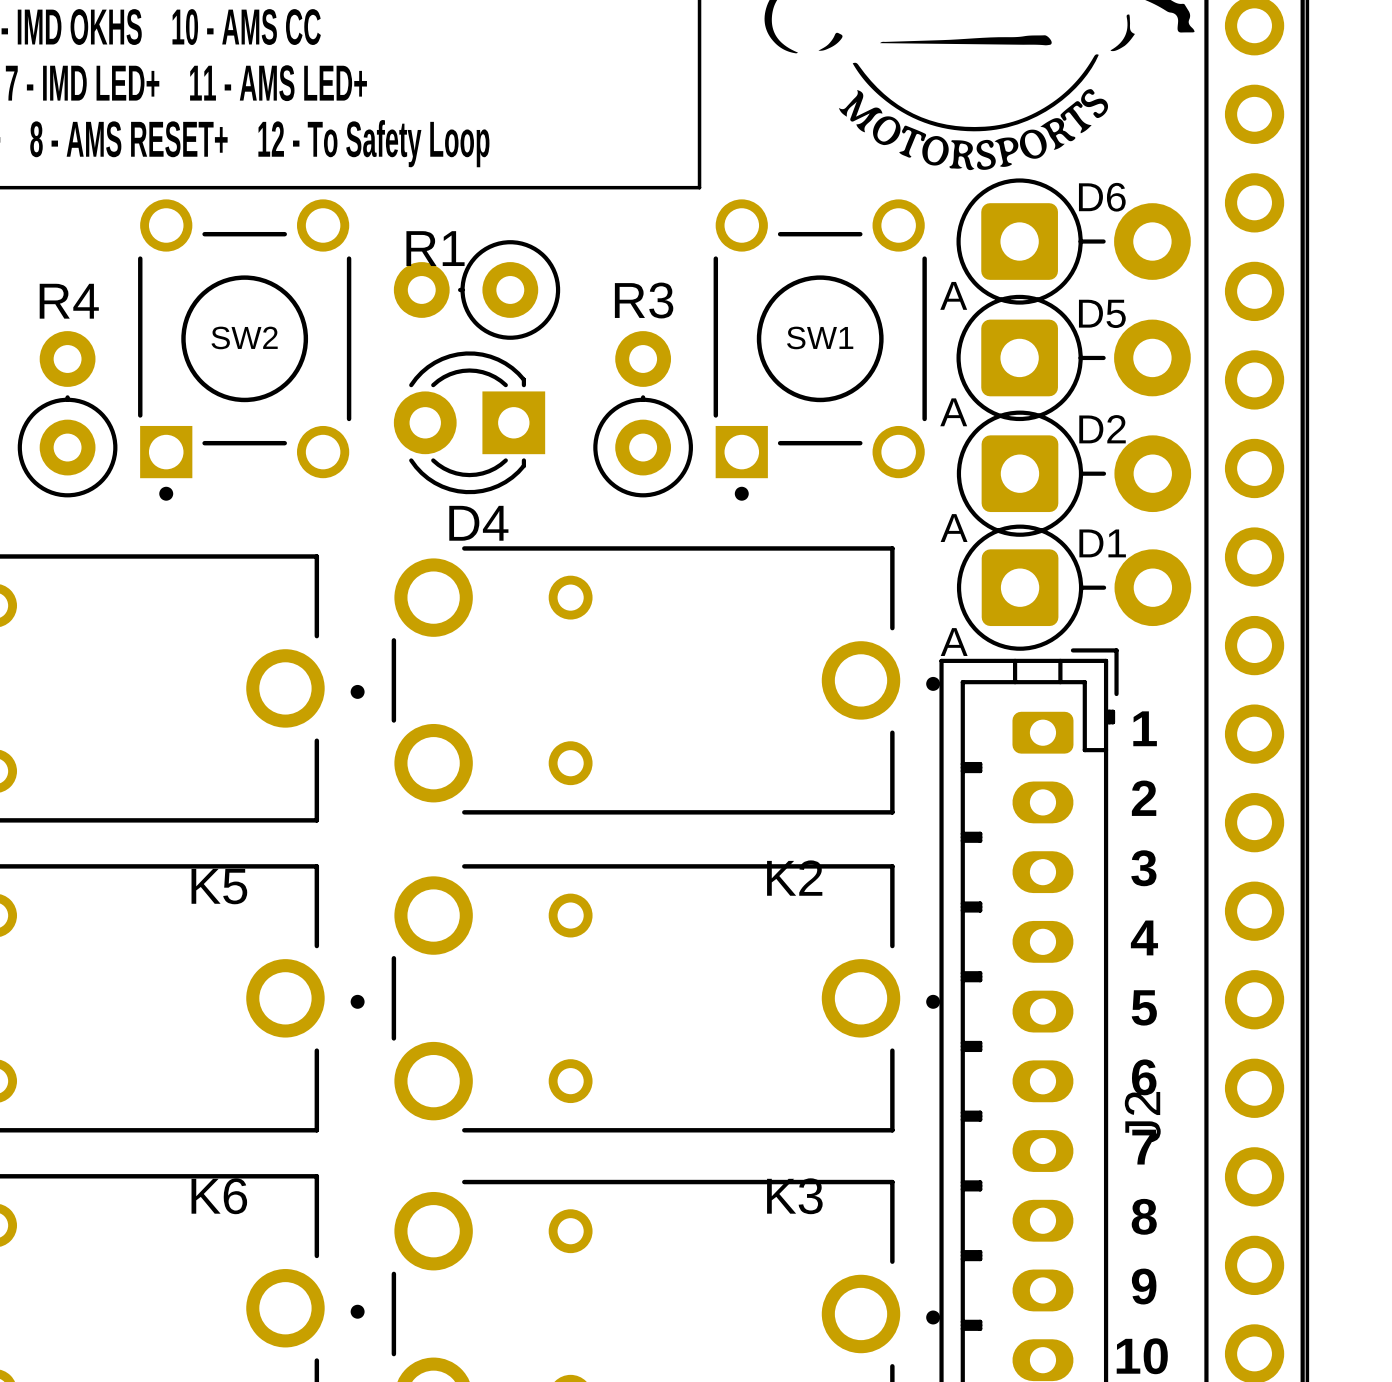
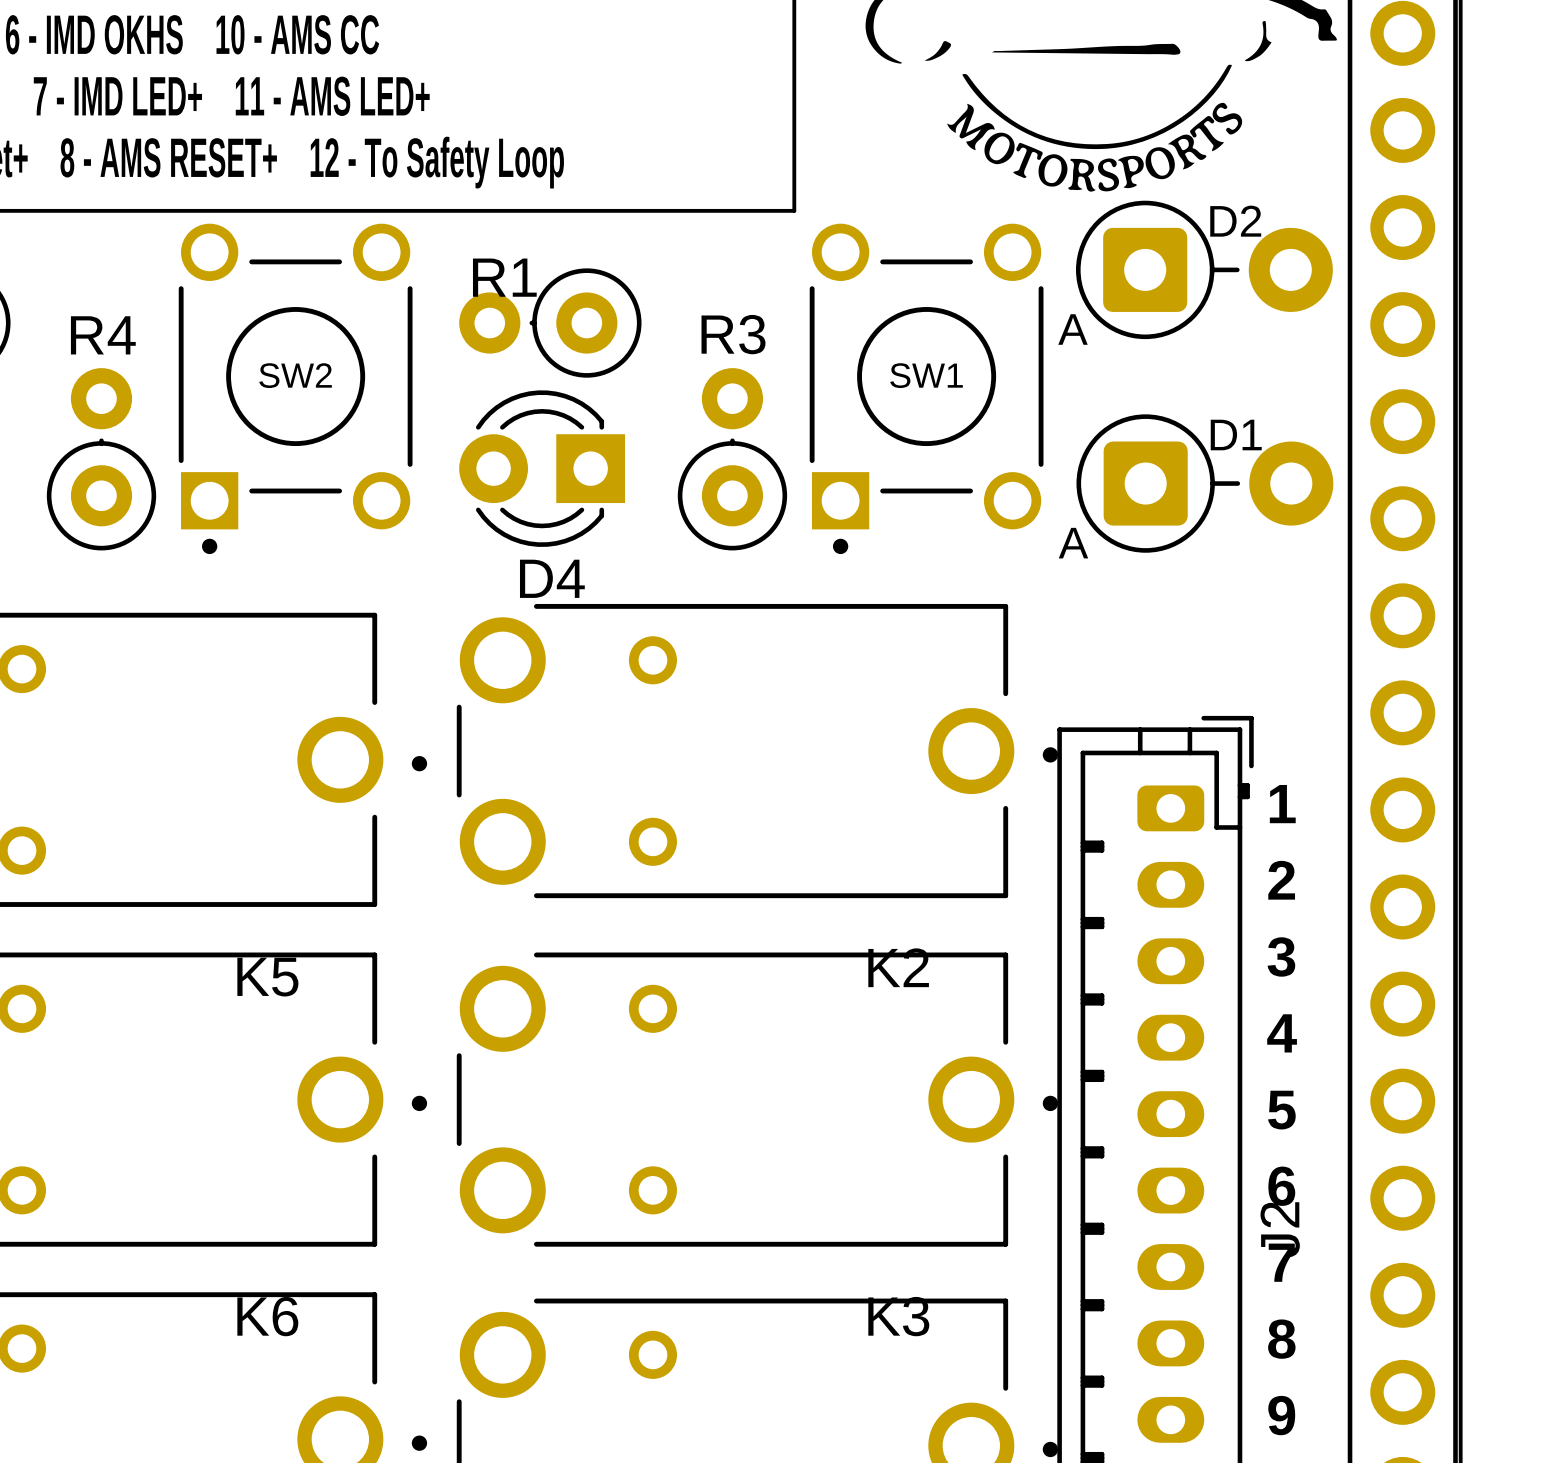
D6 name: D6 (1102, 197) -> D2 (1235, 221)
D5: (1073, 357) -> none
D2: (1073, 473) -> none
D1 position: (1074, 587) -> (1204, 483)

